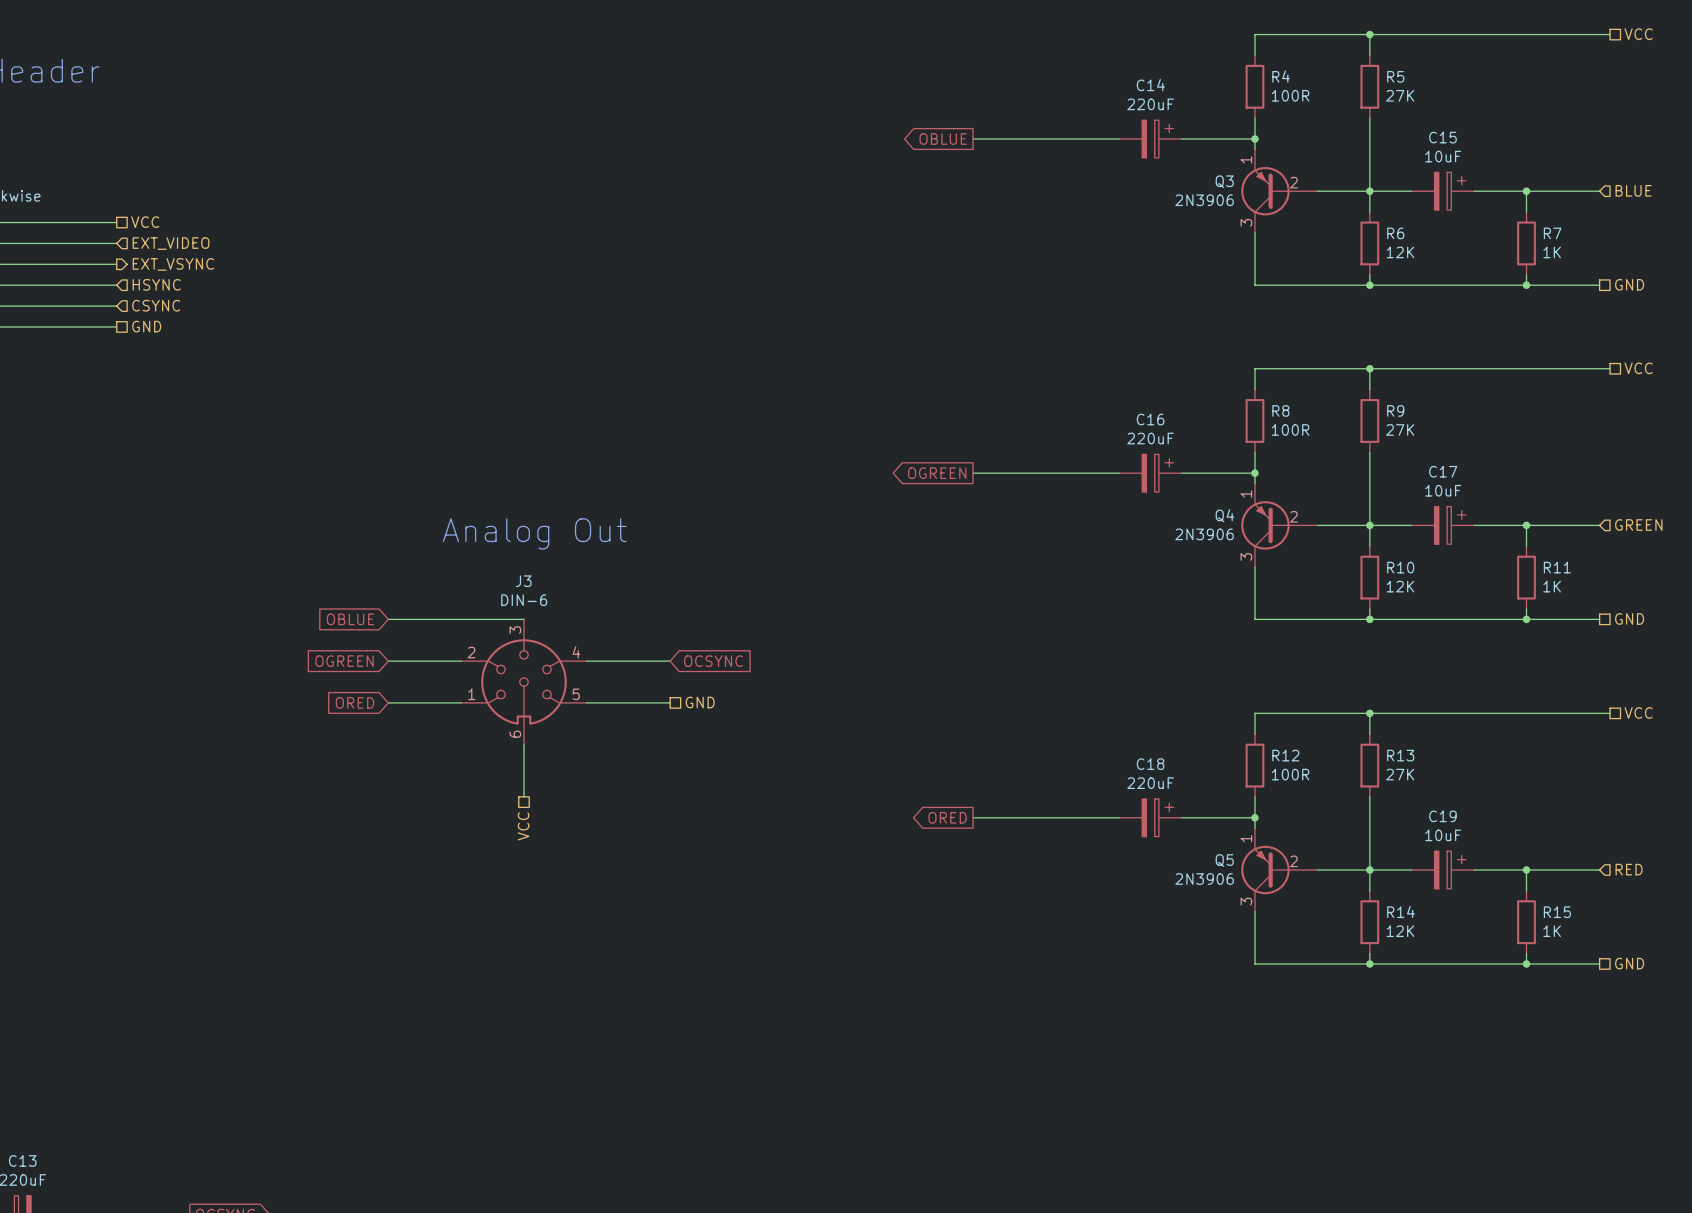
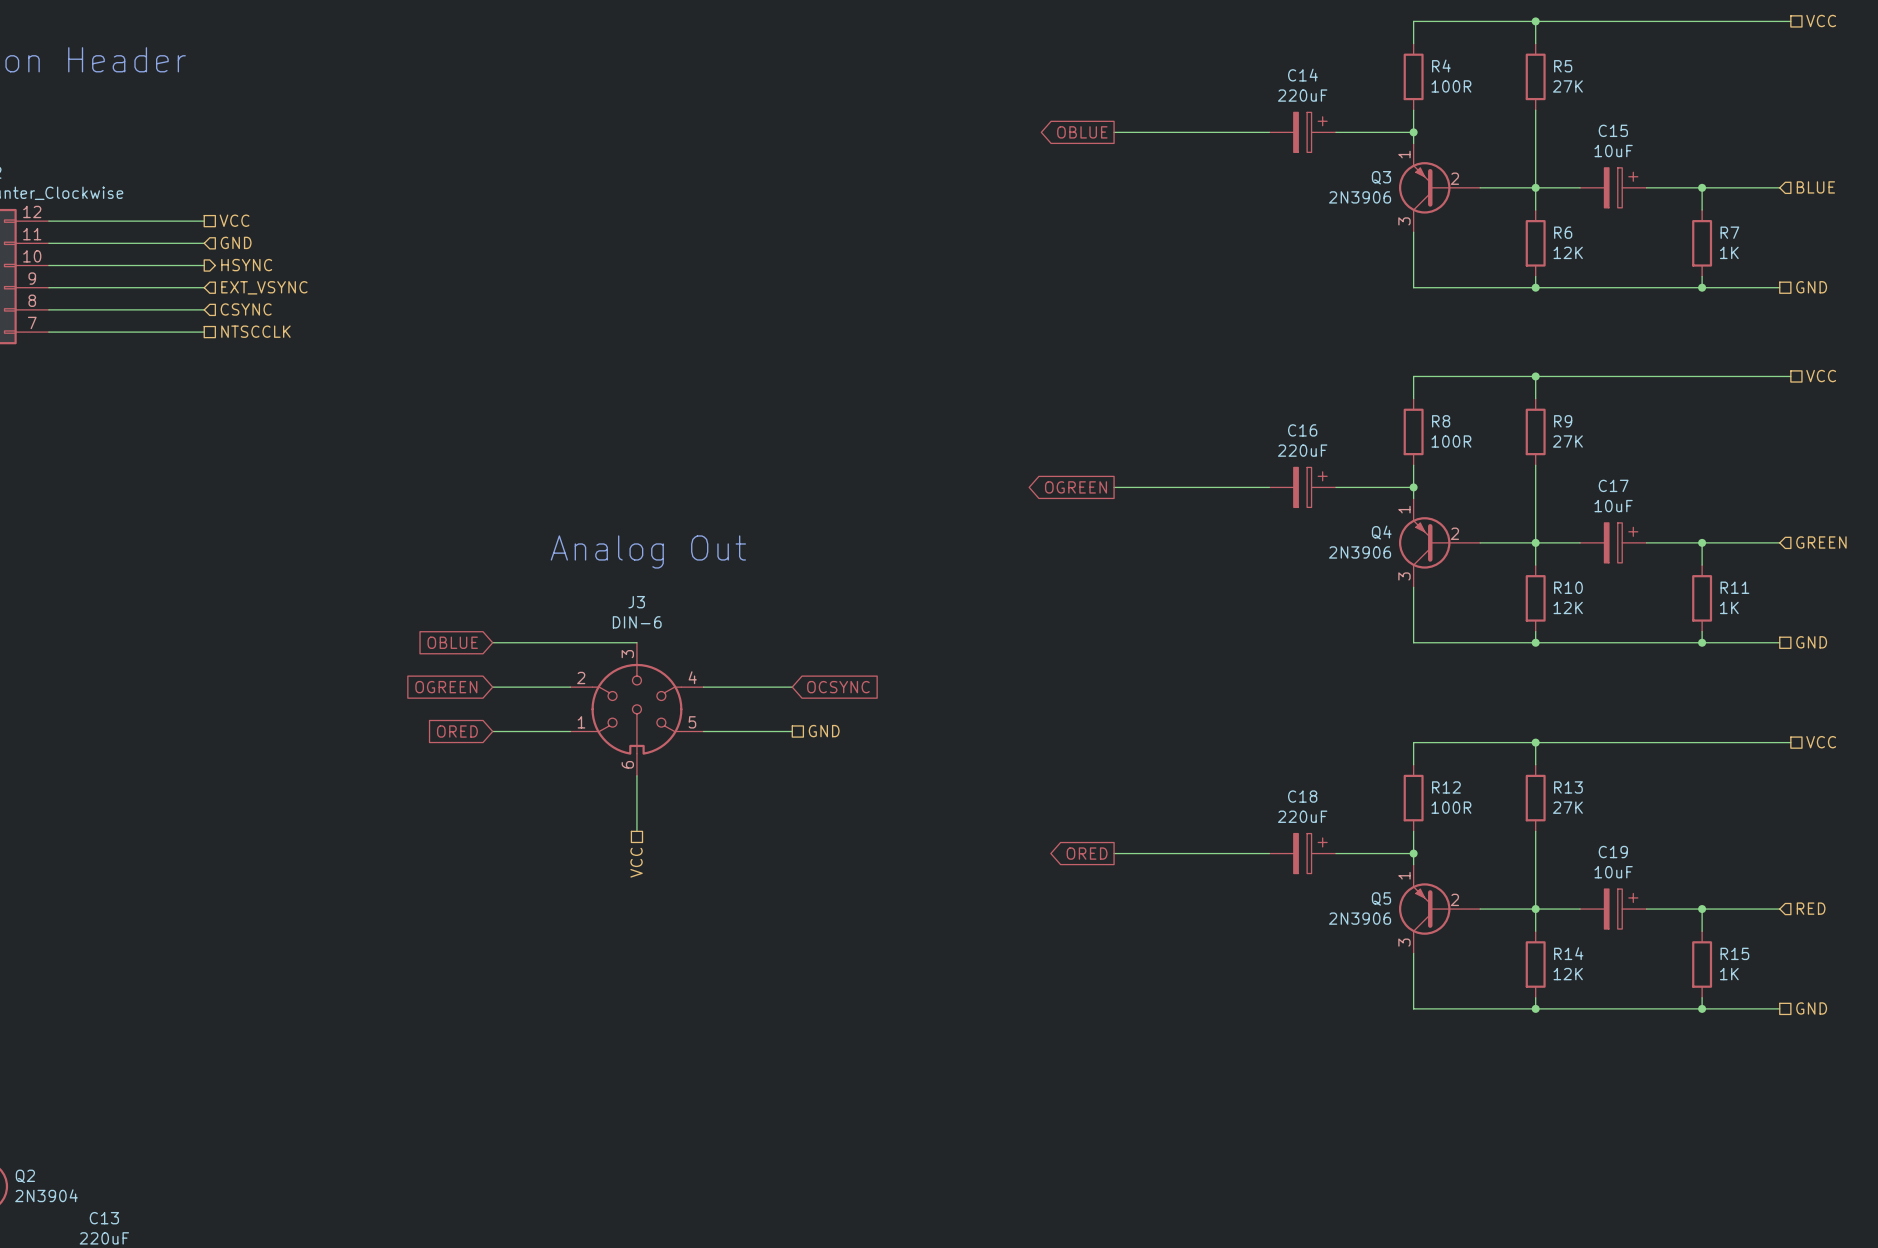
hierarchical label: EXT_VIDEO (171, 243) -> GND (236, 242)
hierarchical label: EXT_VSYNC (173, 264) -> HSYNC (246, 265)
hierarchical label: HSYNC (156, 284) -> EXT_VSYNC (264, 287)
hierarchical label: GND (146, 326) -> NTSCCLK (255, 331)

